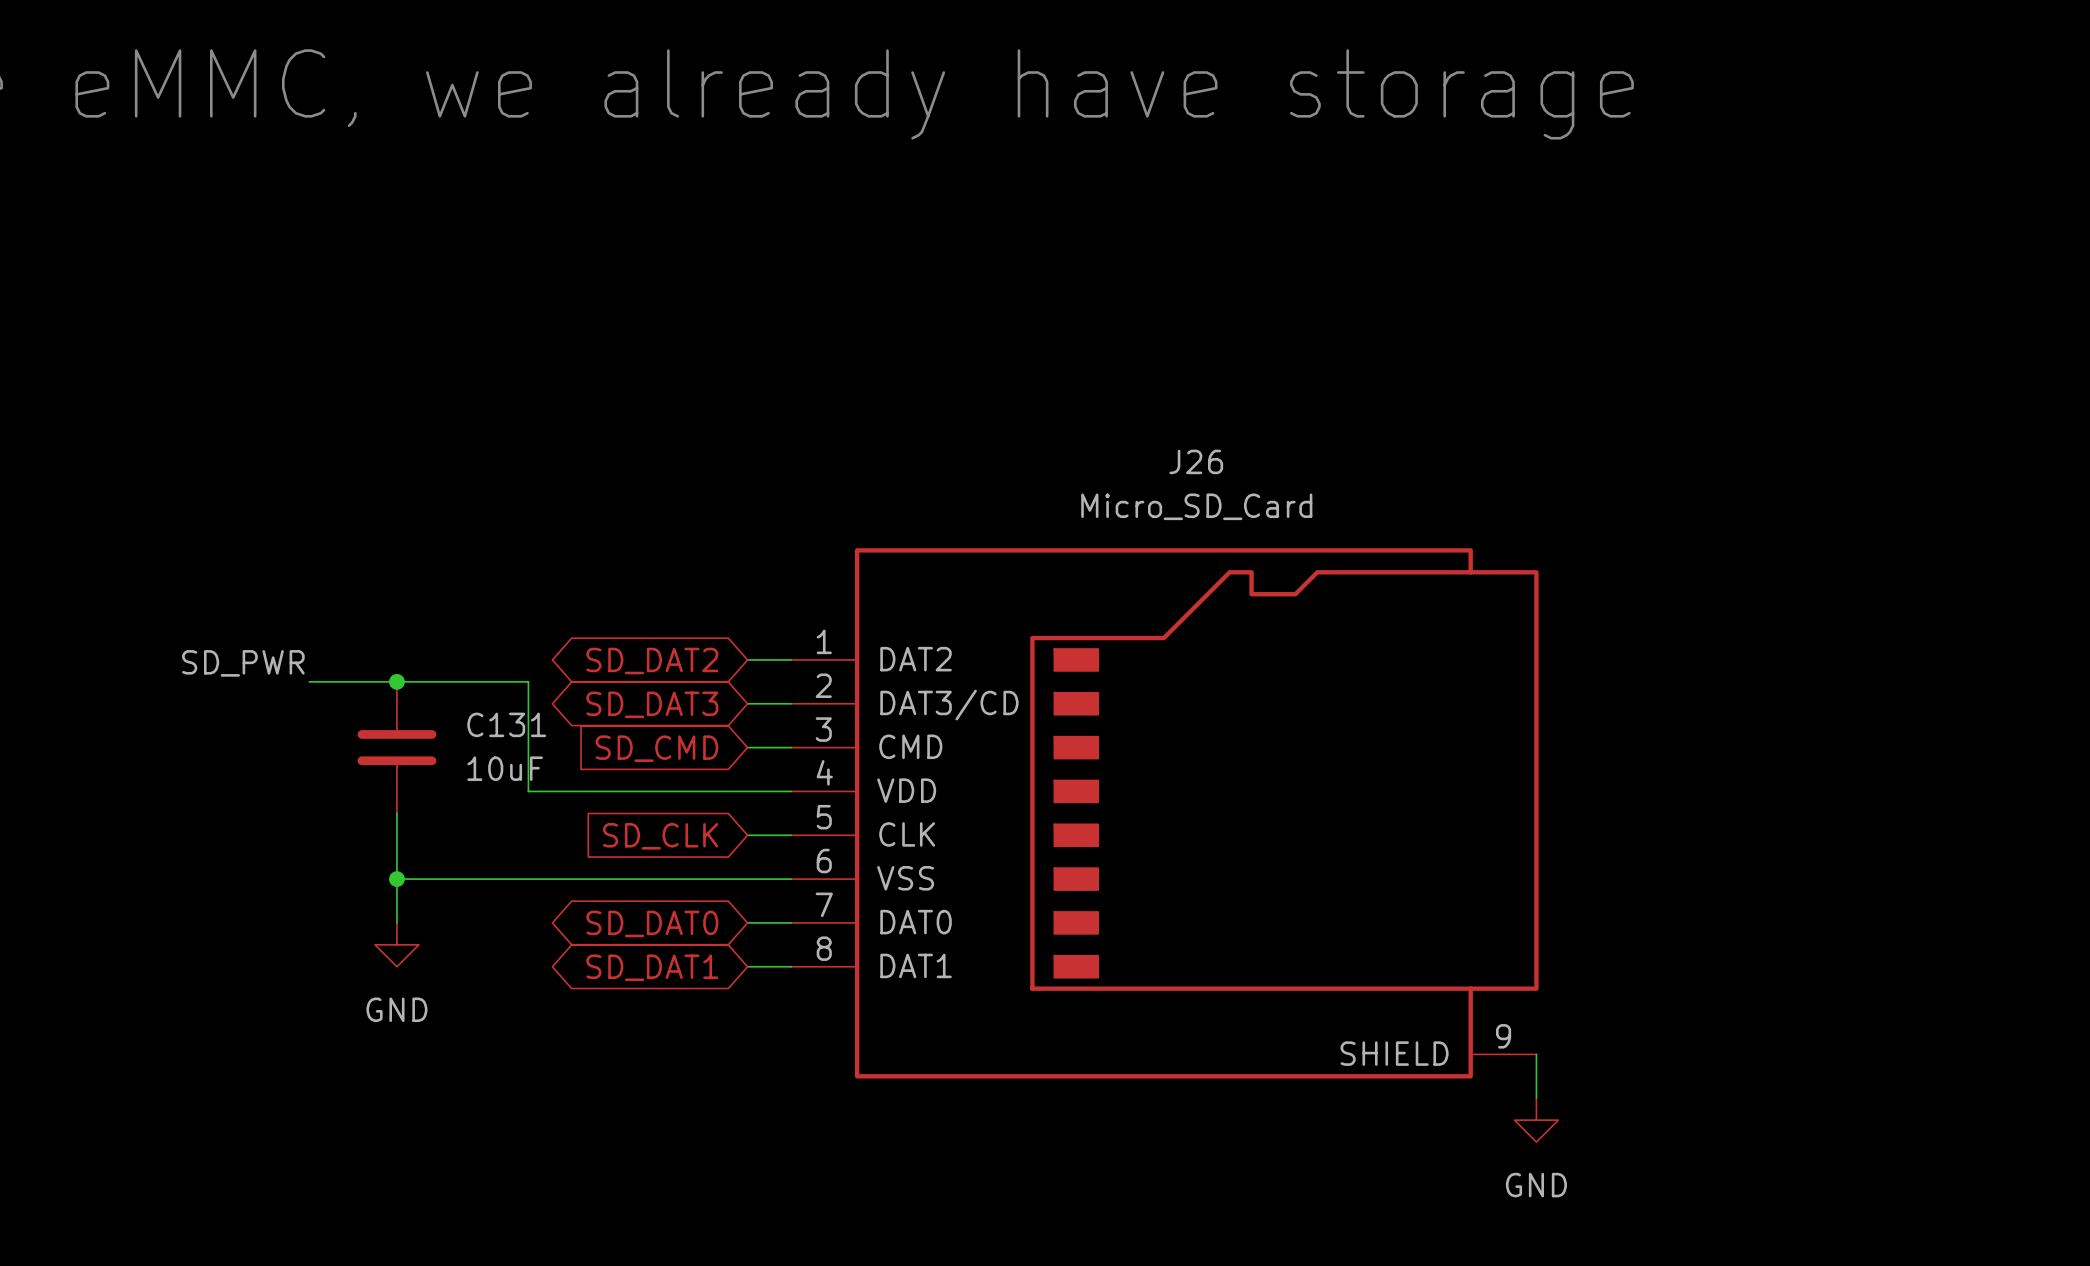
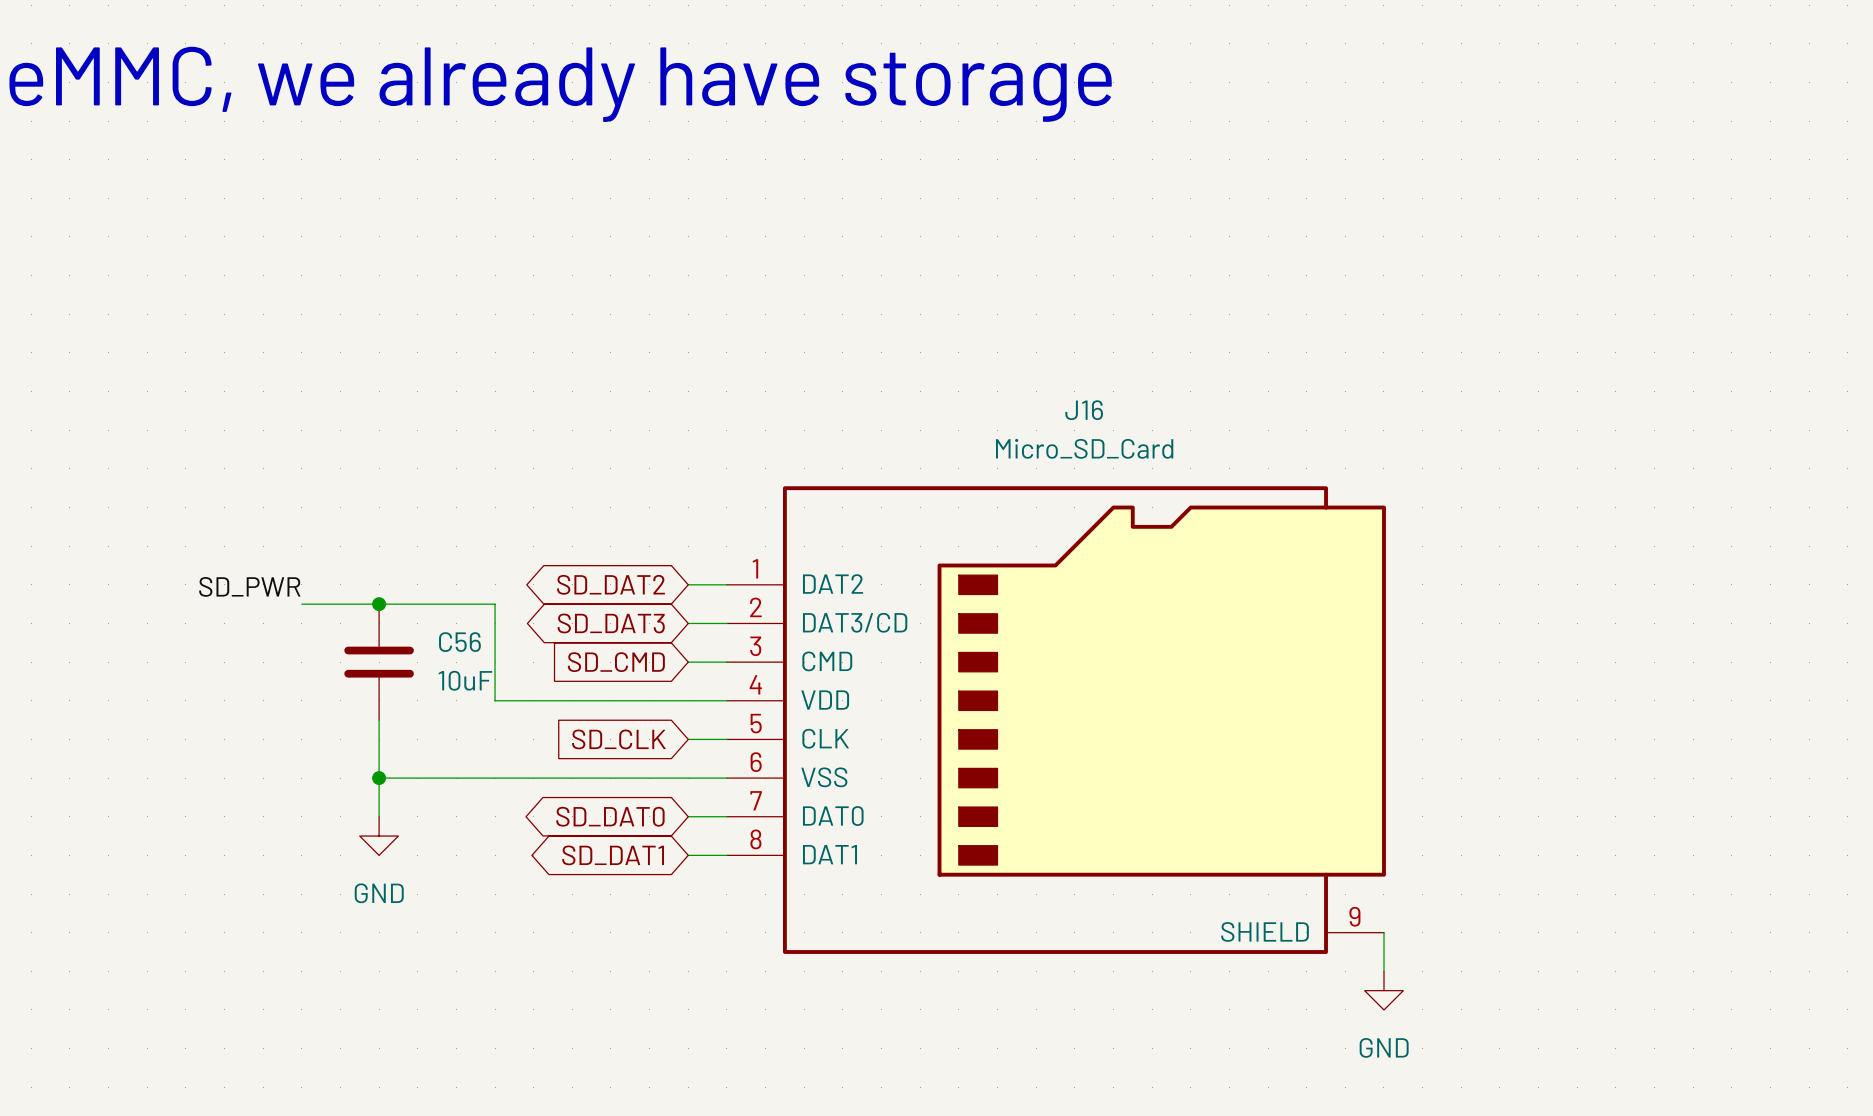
J26 name: J26 (1196, 461) -> J16 (1084, 410)
C131 name: C131 (506, 724) -> C56 (459, 642)

